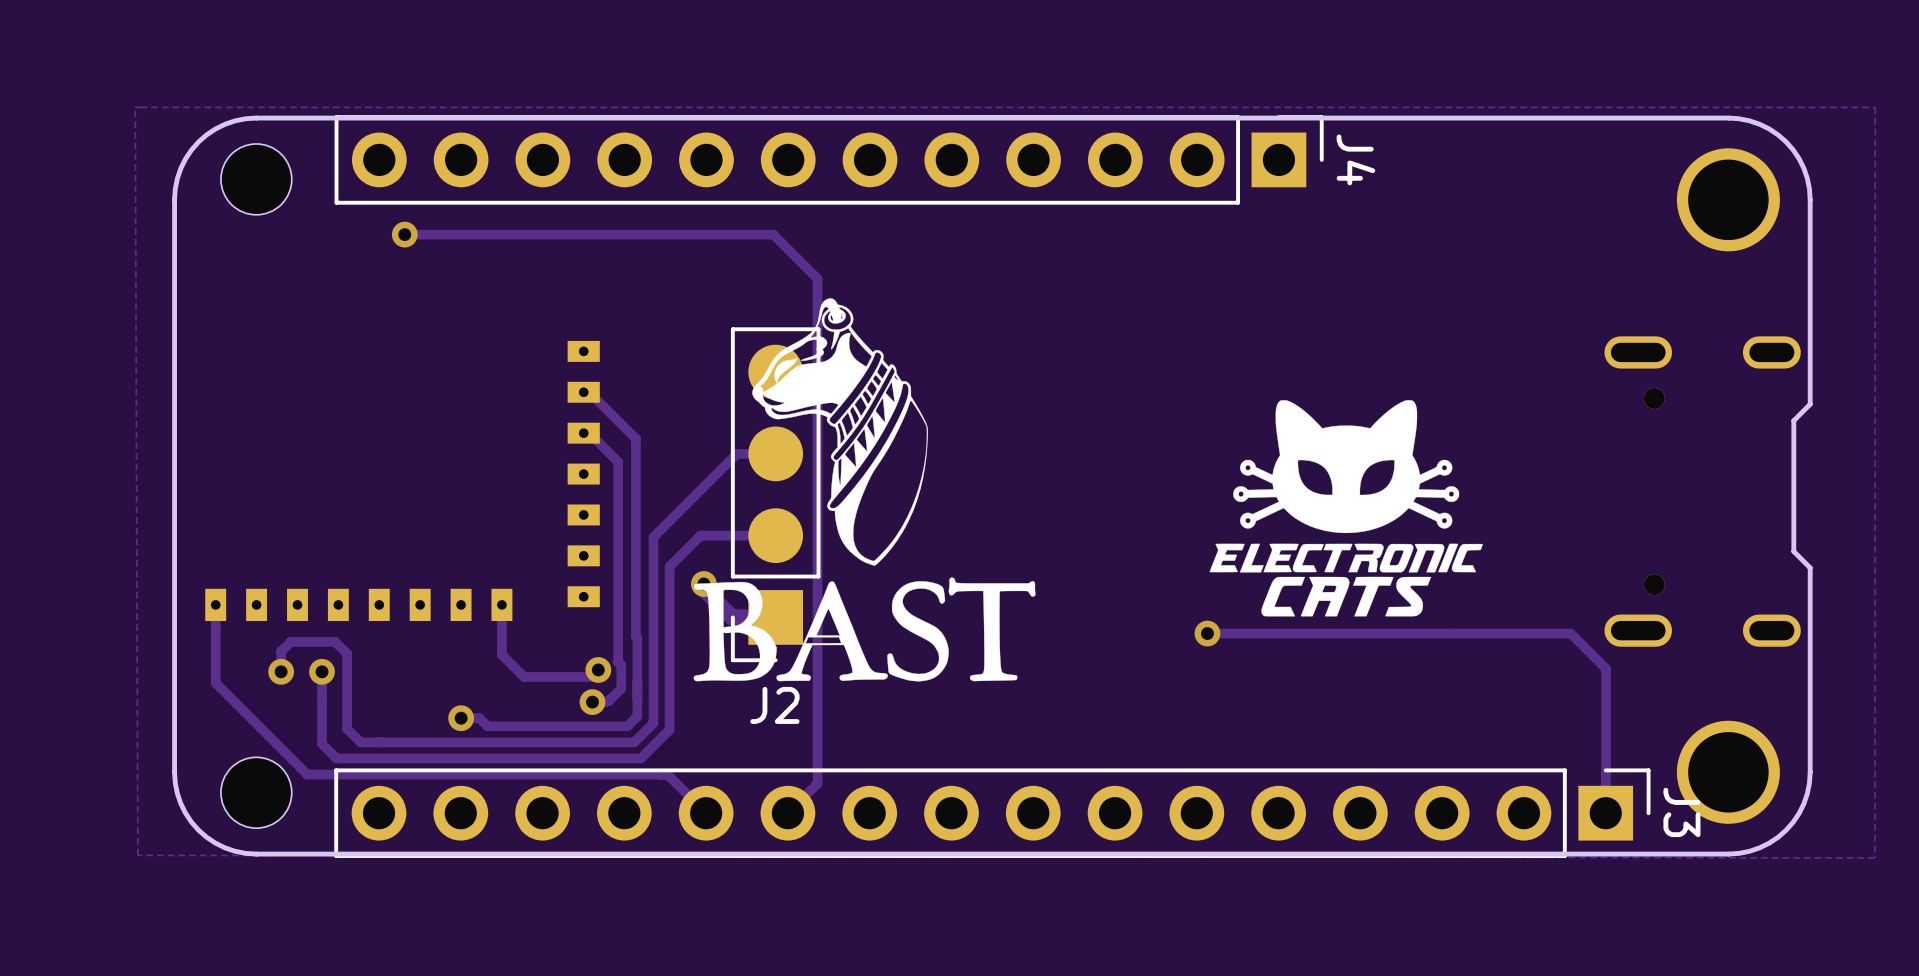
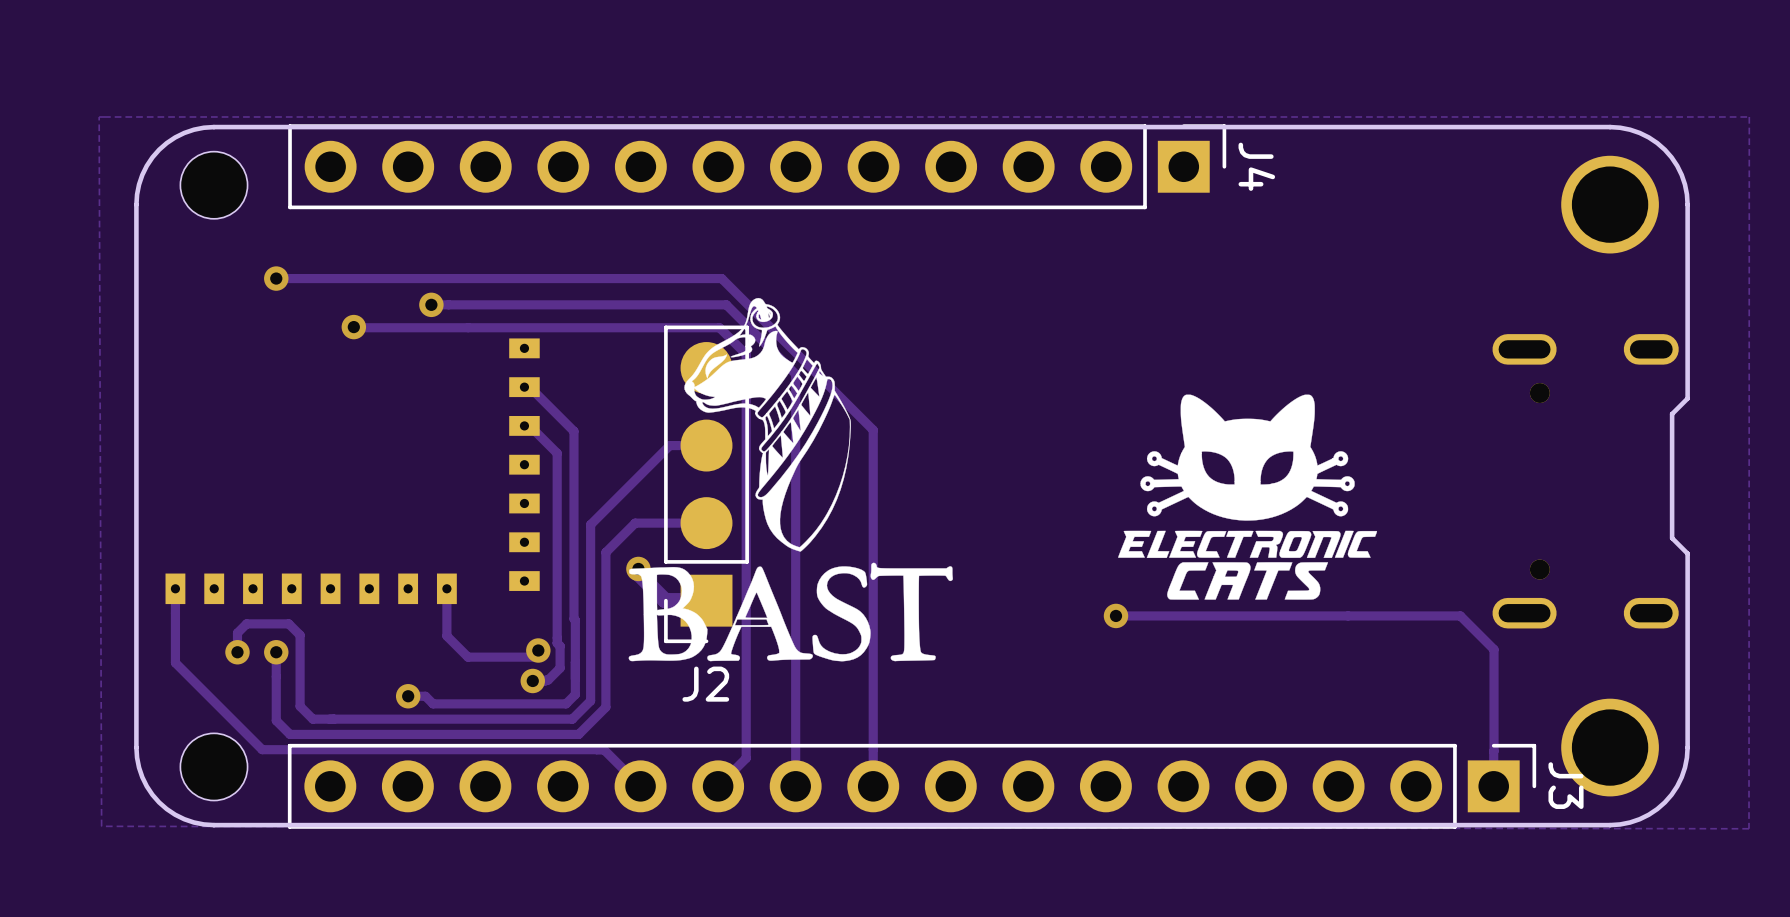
track: (404, 234) (773, 234) (817, 278) (817, 357) -> (353, 327) (719, 327) (746, 354)
via: (404, 234) -> none
track: none -> (276, 278) (721, 278) (873, 430) (873, 786)
via: none -> (276, 278)
track: none -> (431, 304) (726, 304) (795, 374) (795, 786)
via: none -> (431, 304)
via: none -> (353, 327)

